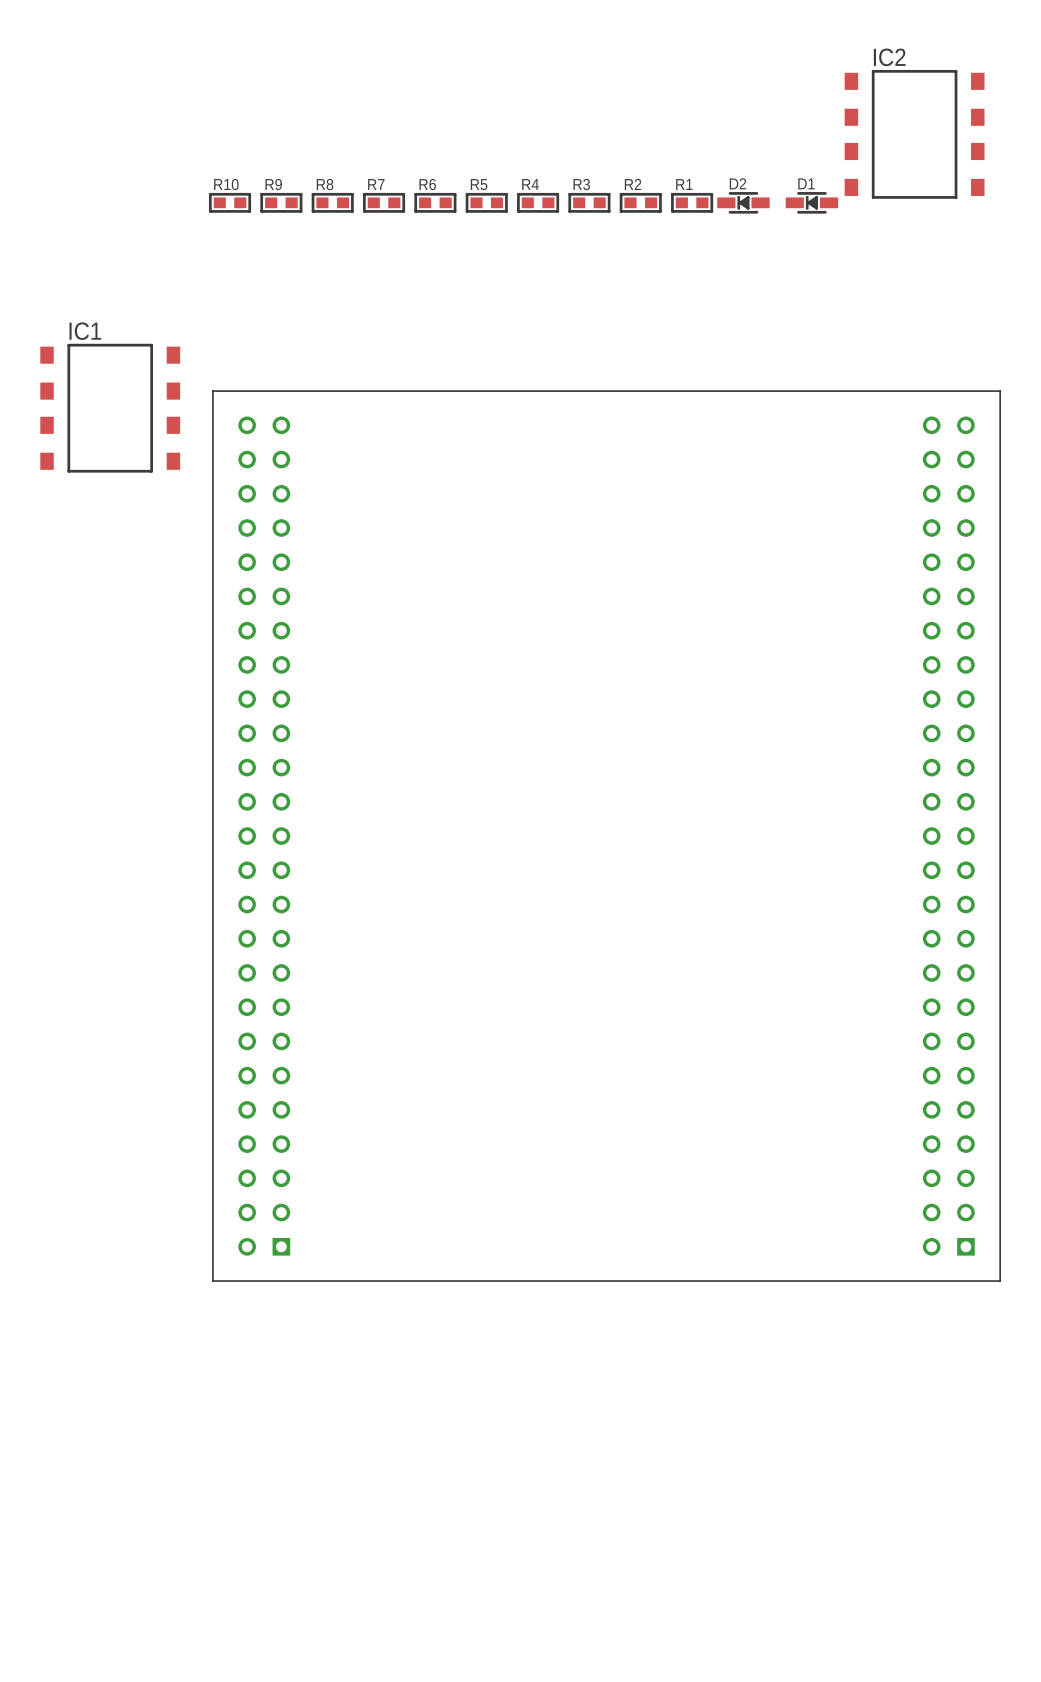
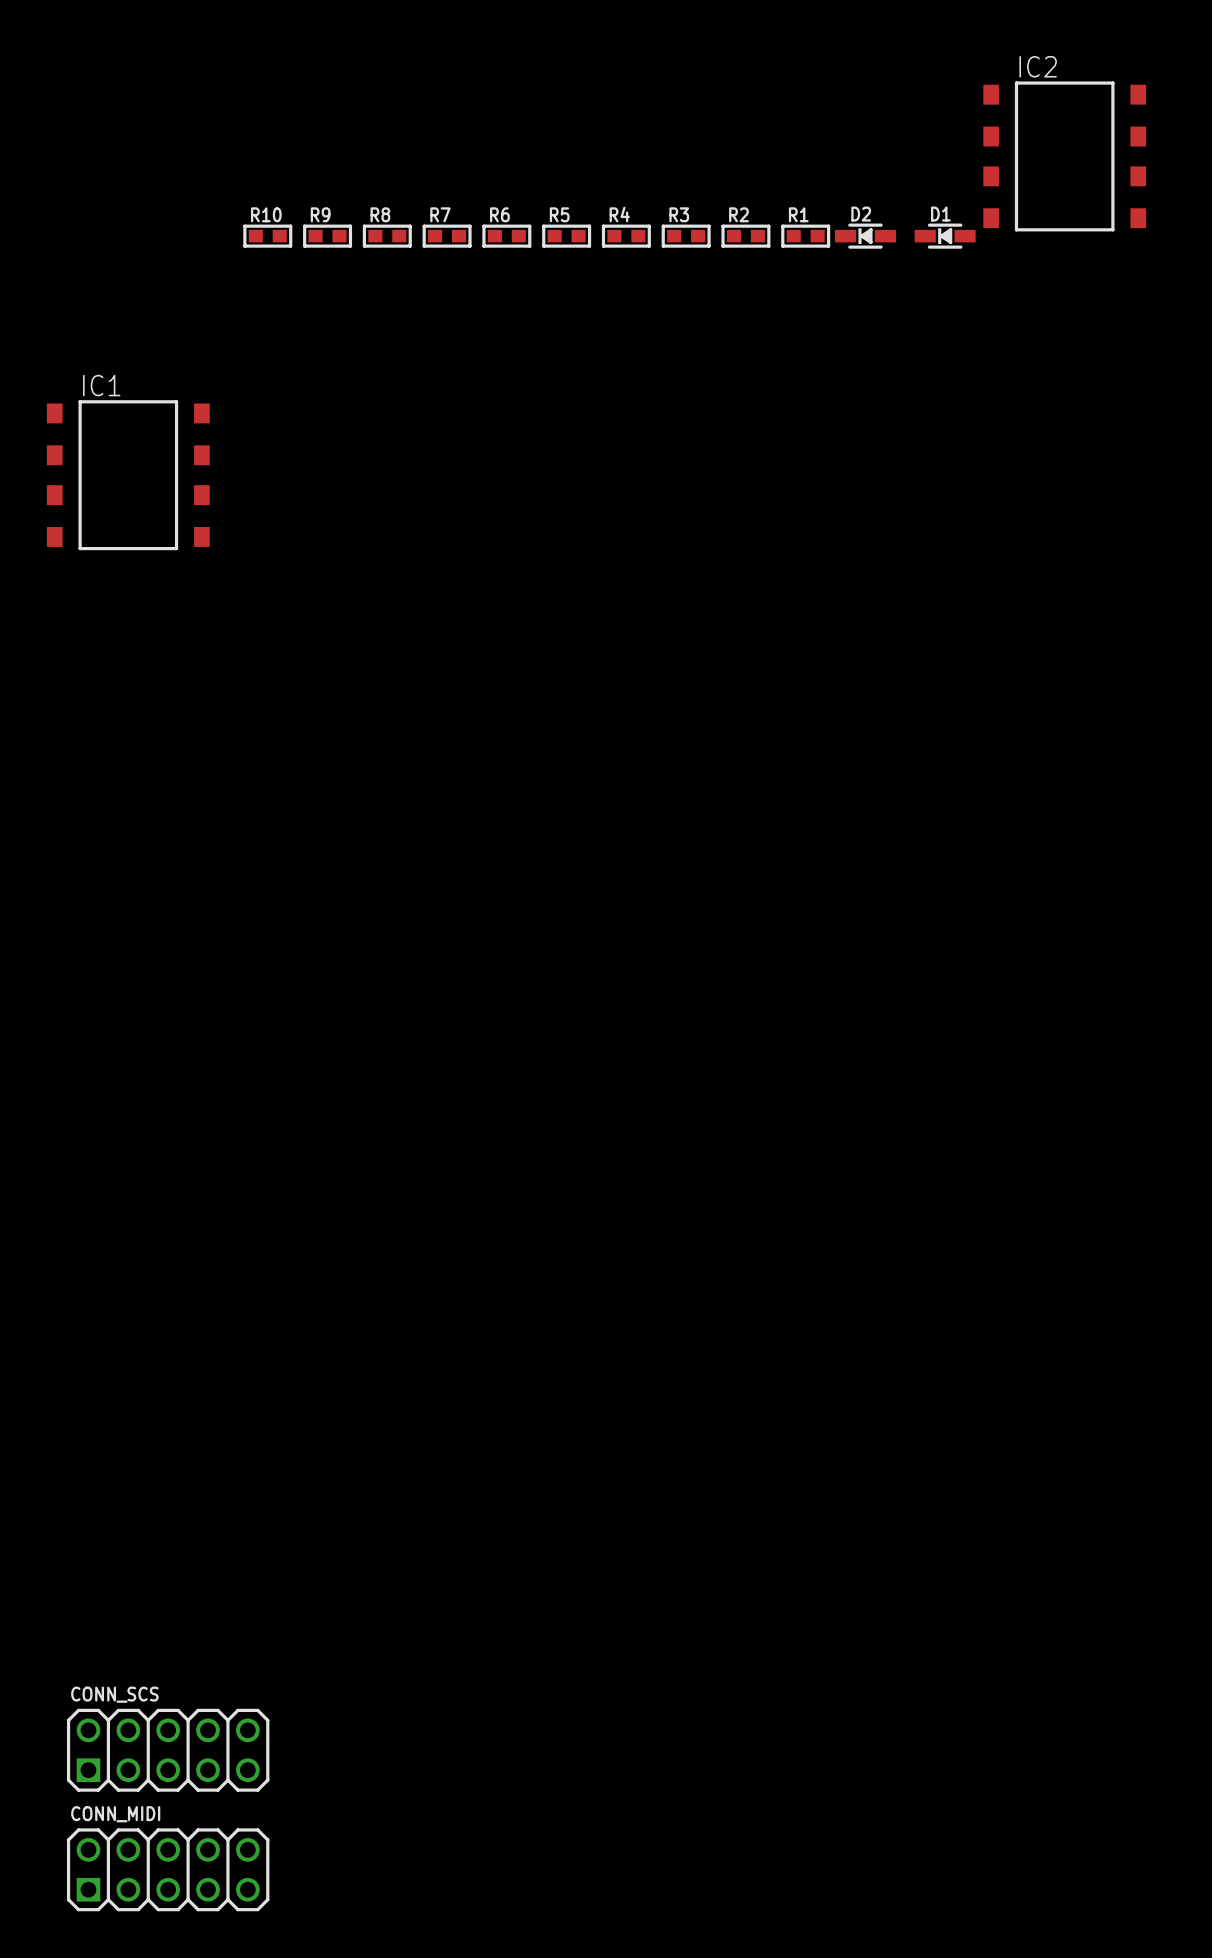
part: (606, 836) -> none
CONN_SCS: none -> (168, 1750)
CONN_MIDI: none -> (168, 1869)

